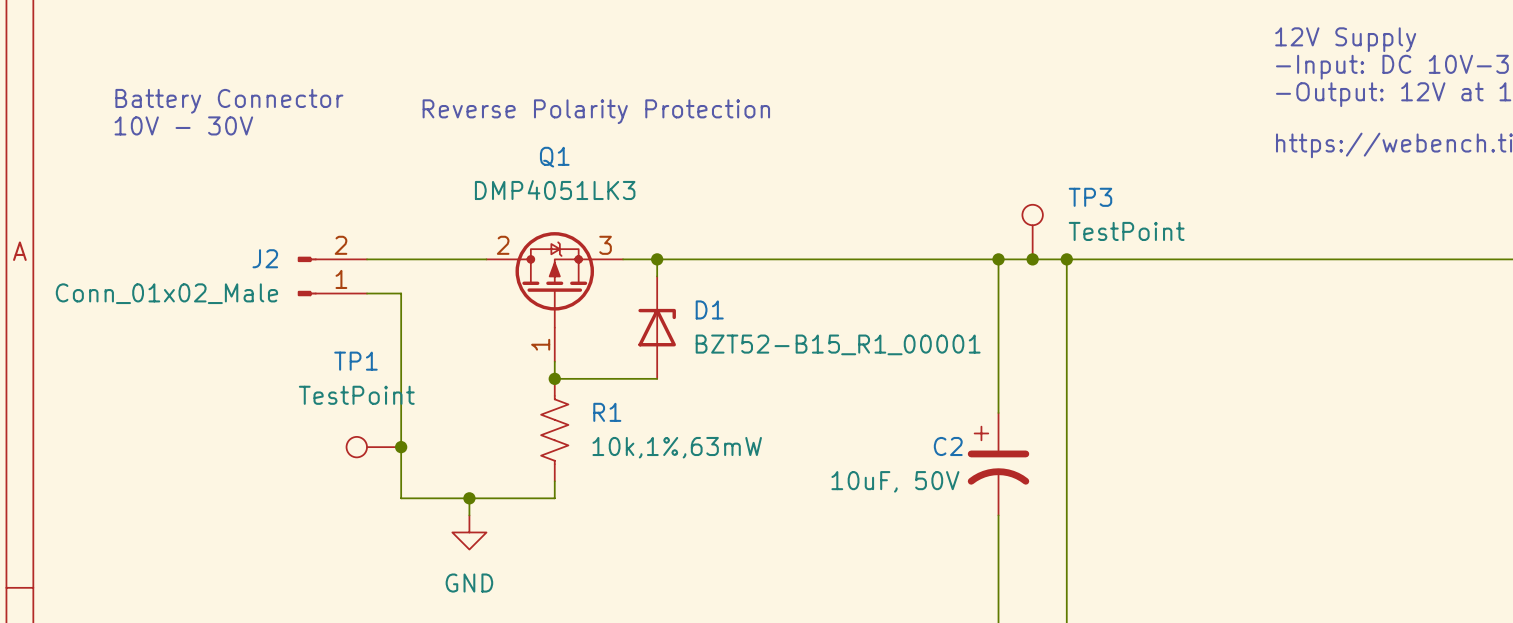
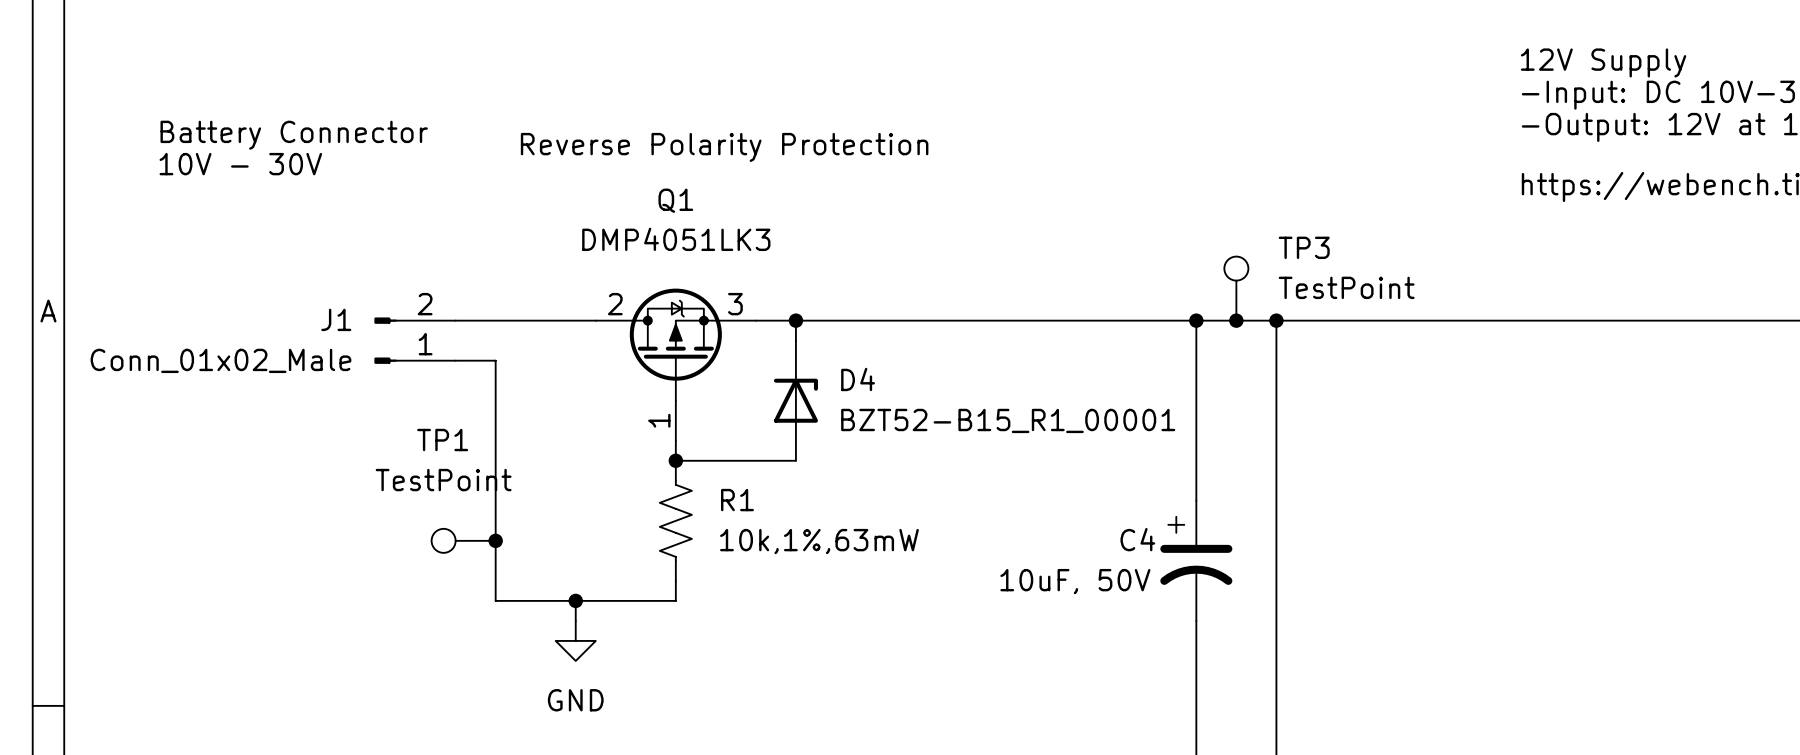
J2 name: J2 (265, 258) -> J1 (336, 319)
D1 name: D1 (709, 309) -> D4 (858, 379)
C2 name: C2 (948, 446) -> C4 (1137, 539)

